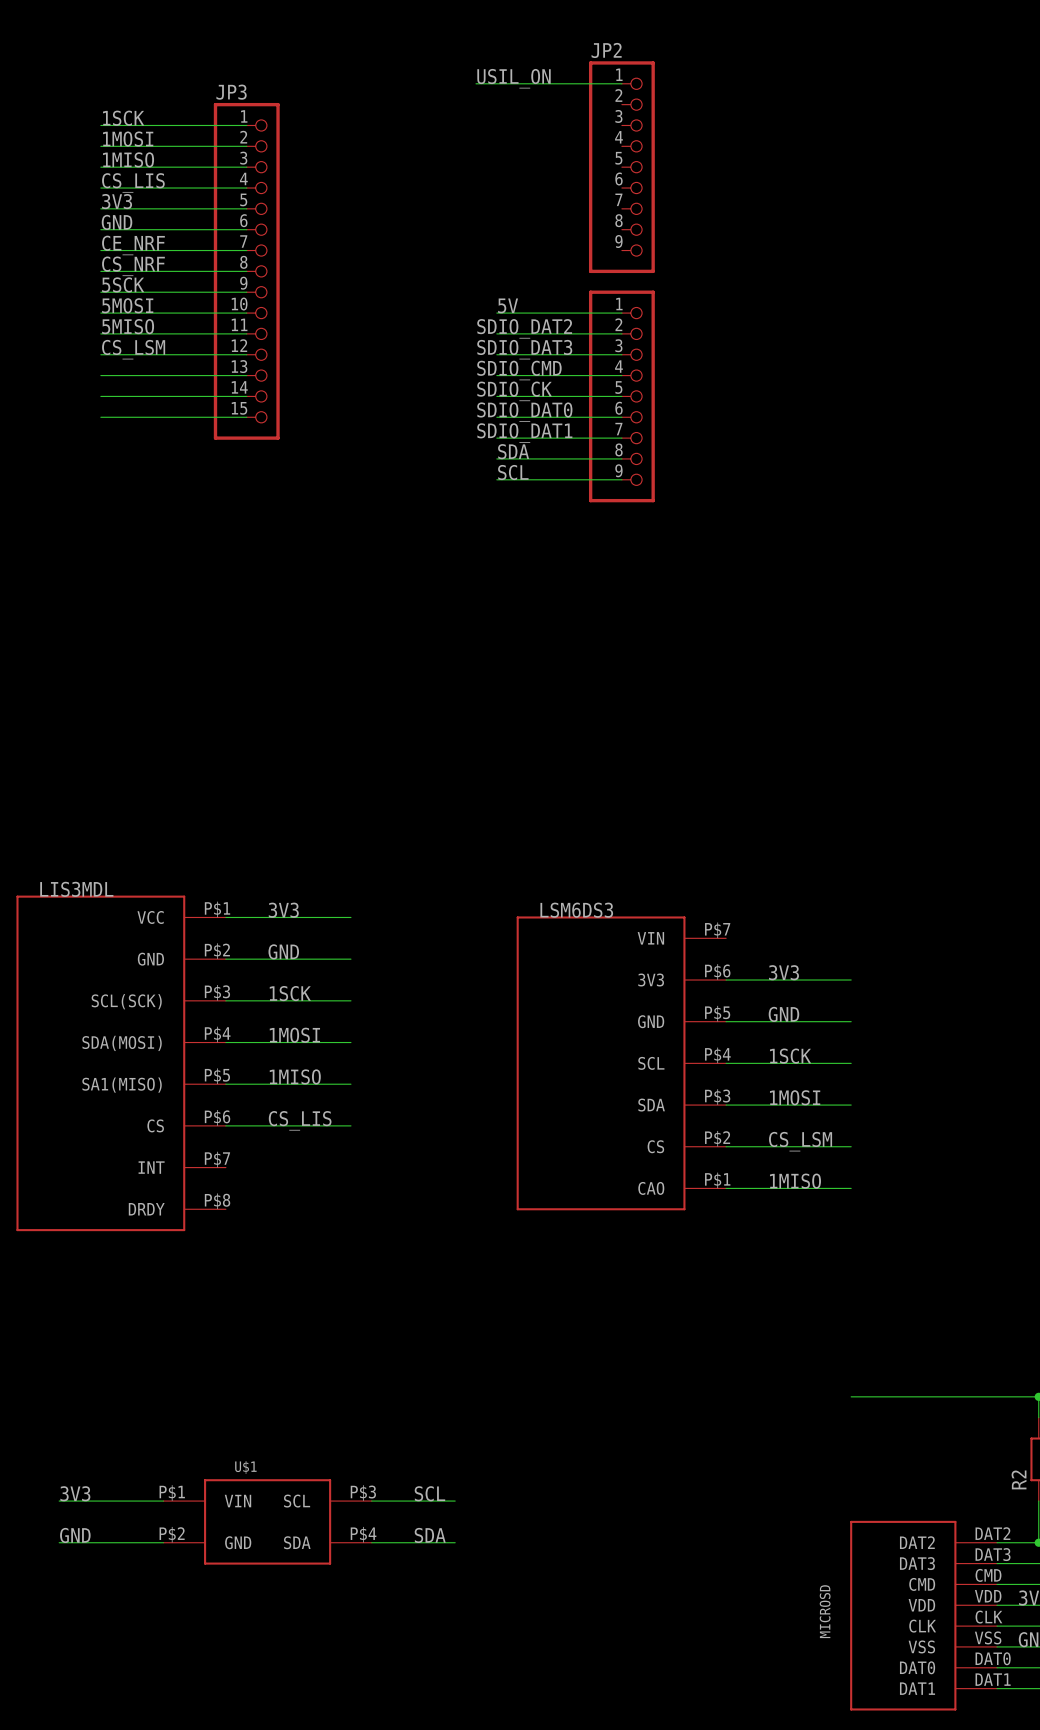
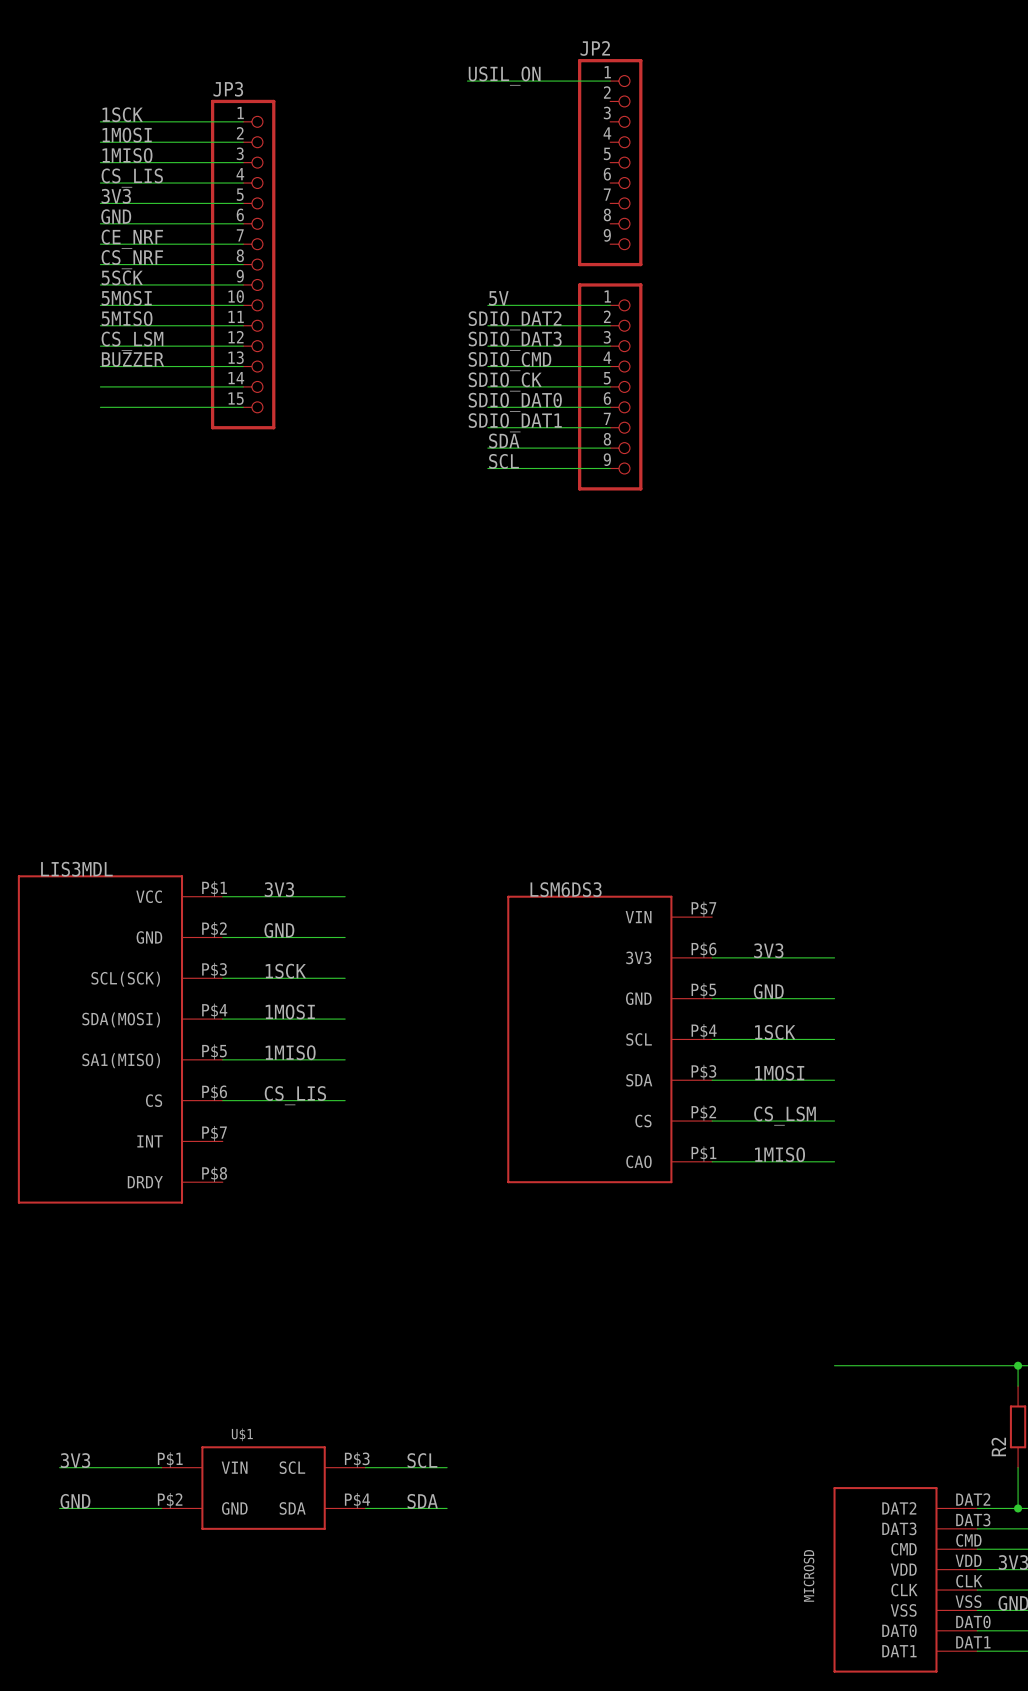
label: none -> BUZZER (132, 359)

